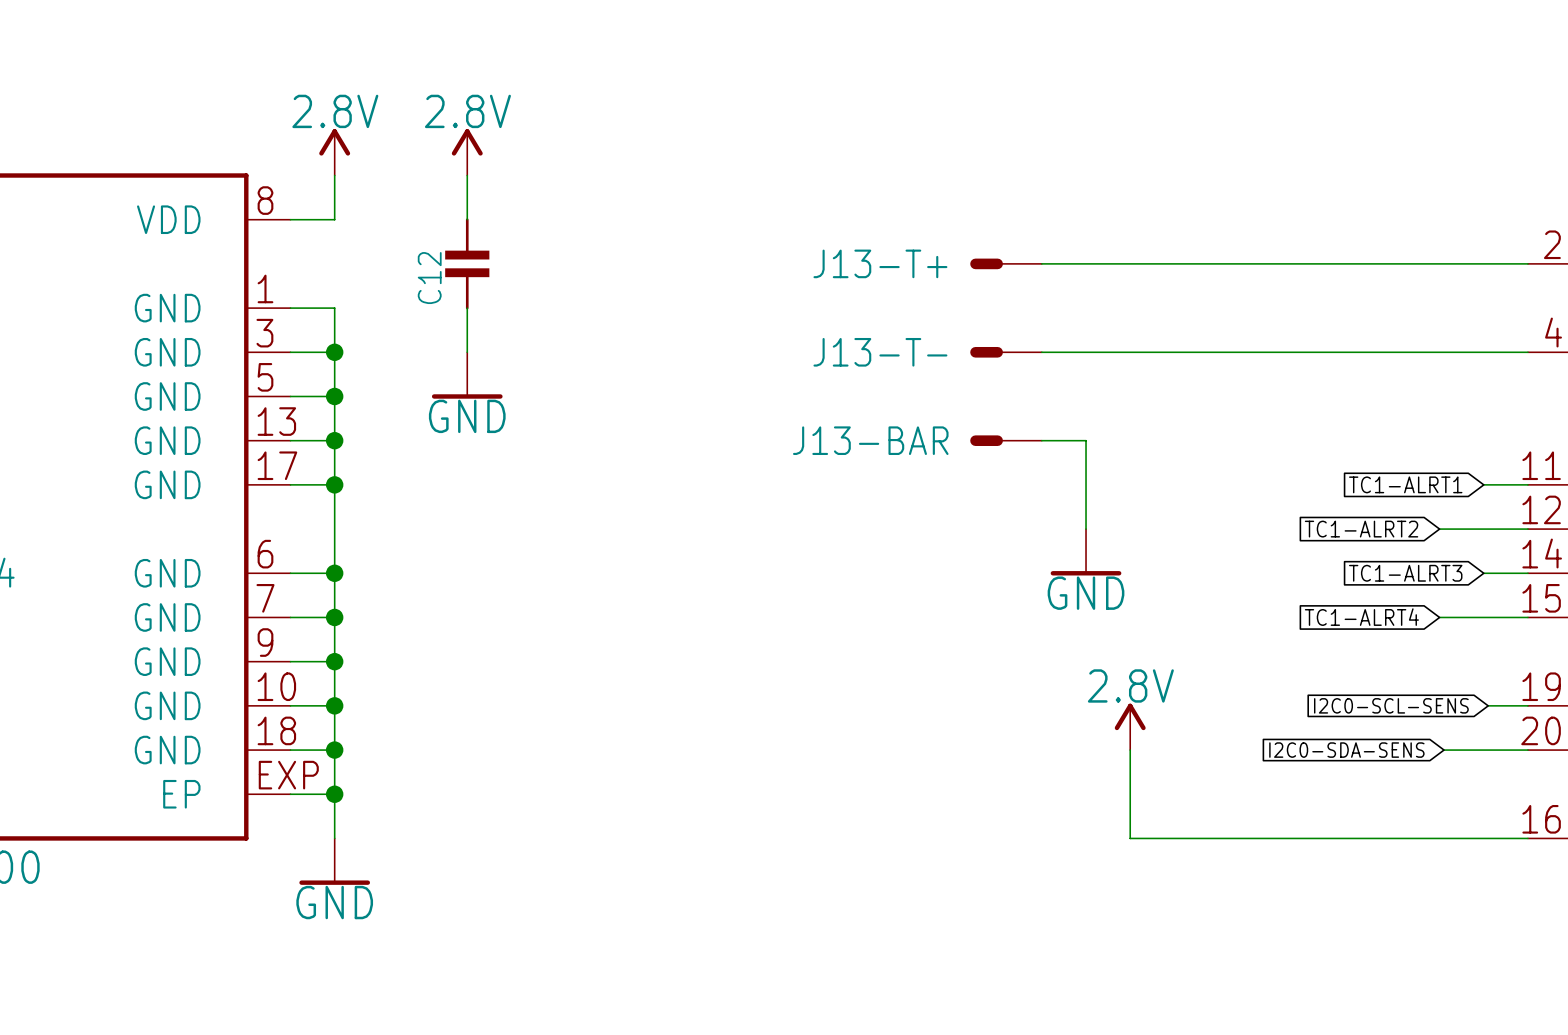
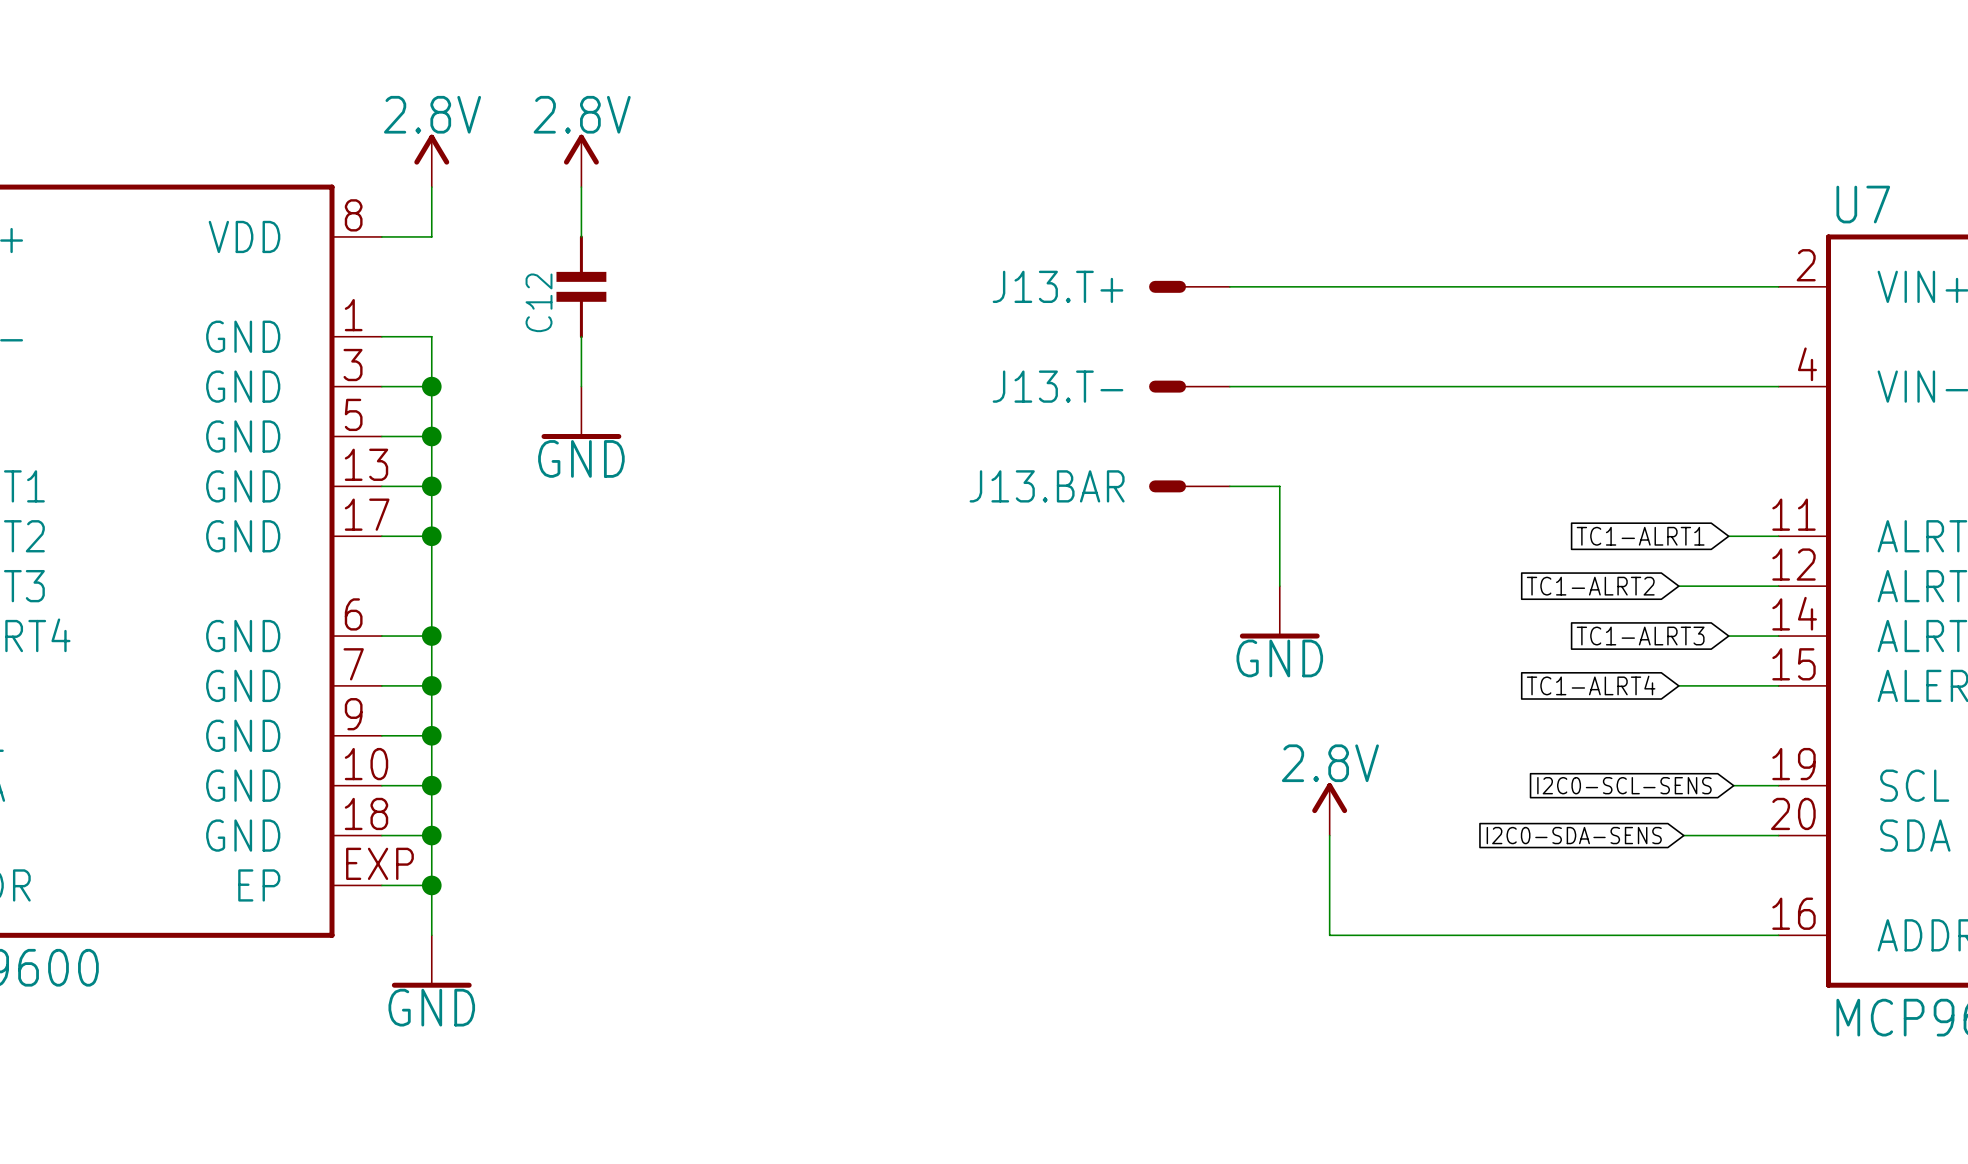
J13-T+ name: J13-T+ (880, 263) -> J13.T+ (1058, 286)
J13-T- name: J13-T- (880, 352) -> J13.T- (1058, 386)
J13-BAR name: J13-BAR (870, 440) -> J13.BAR (1047, 486)

